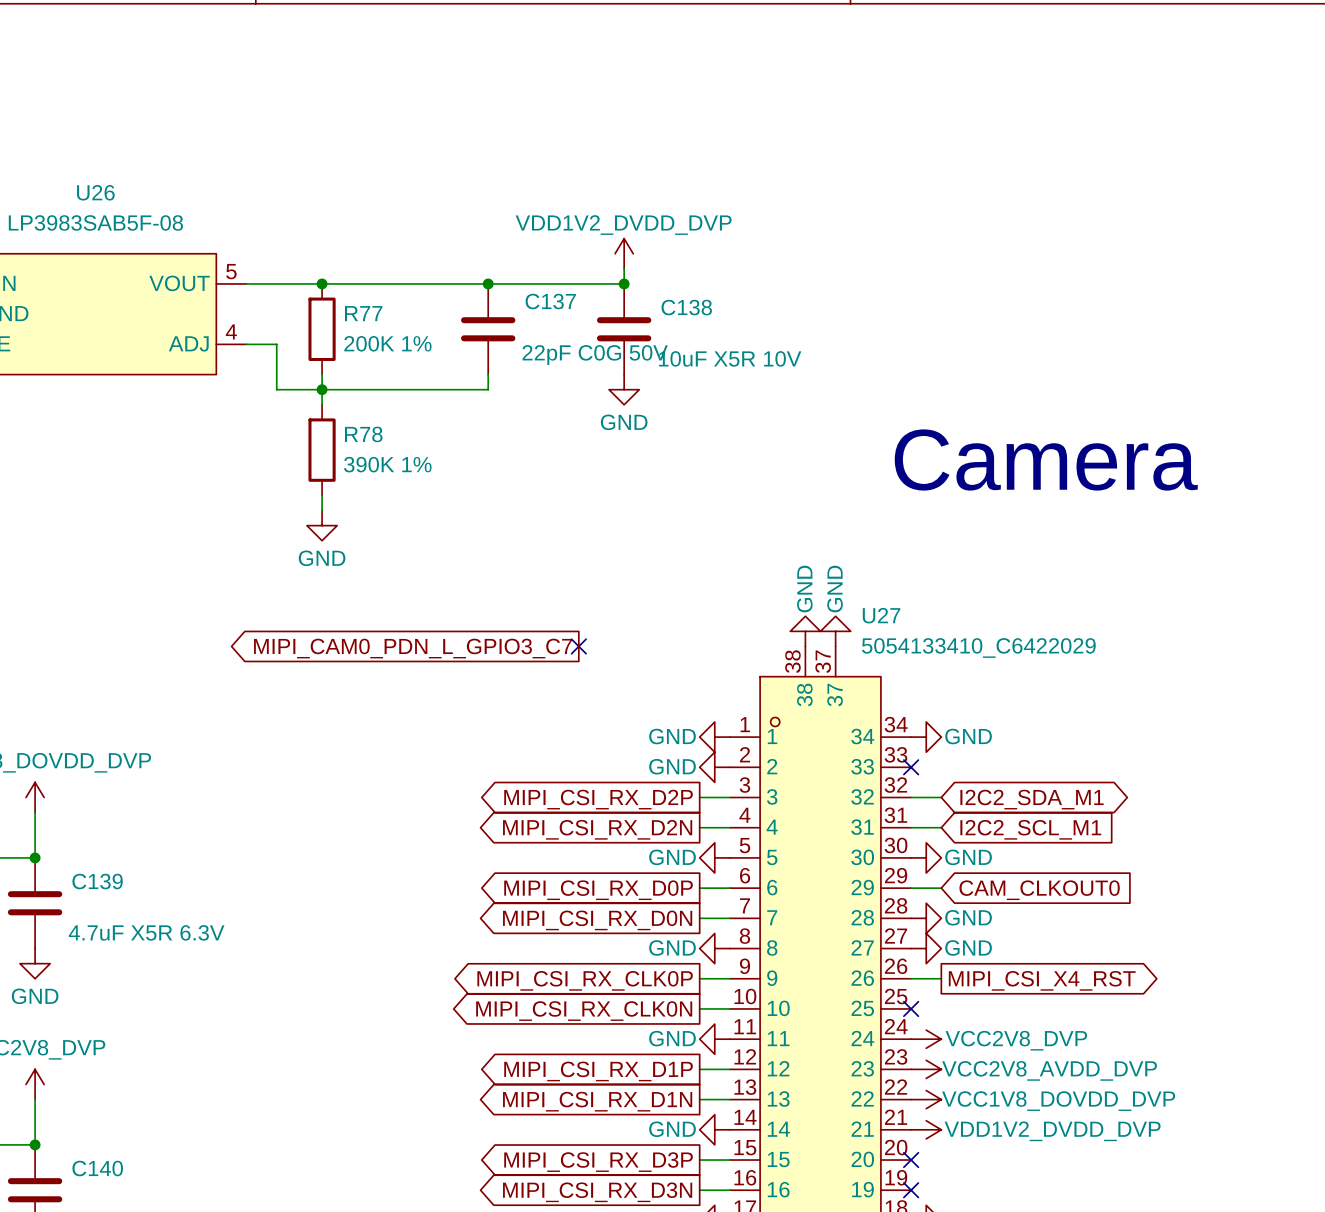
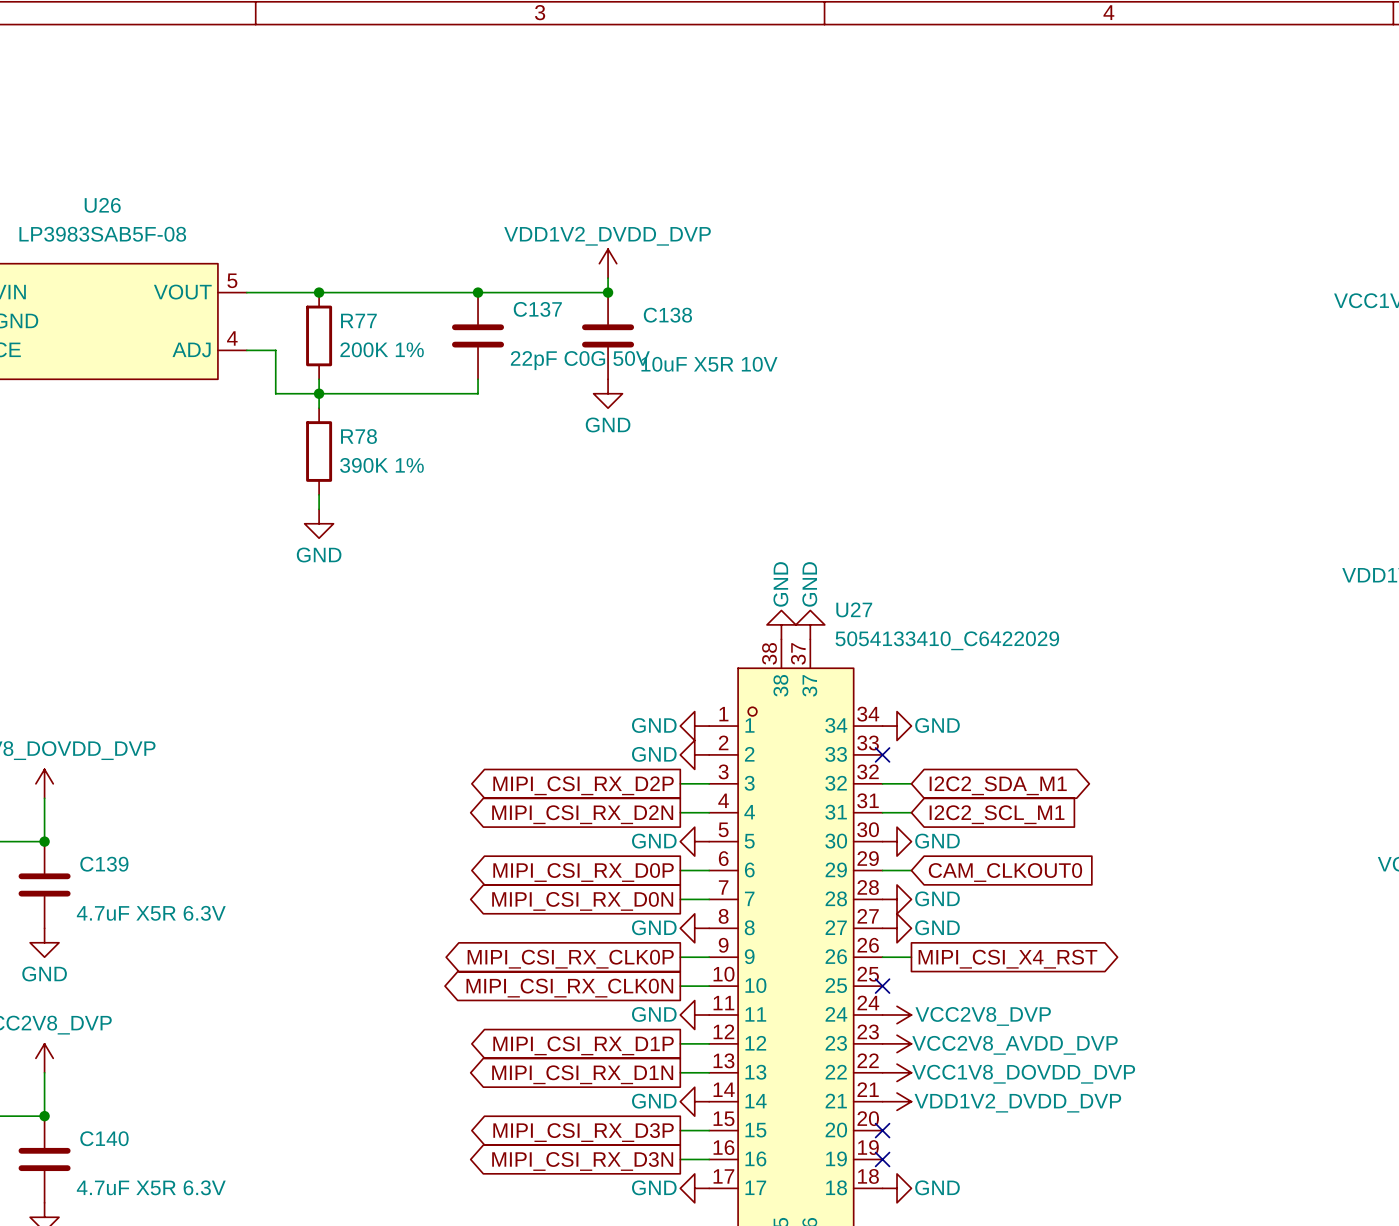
text: Camera (1046, 459) -> none
no-connect mark: (578, 646) -> none
global label: MIPI_CAM0_PDN_L_GPIO3_C7 (413, 648) -> none

